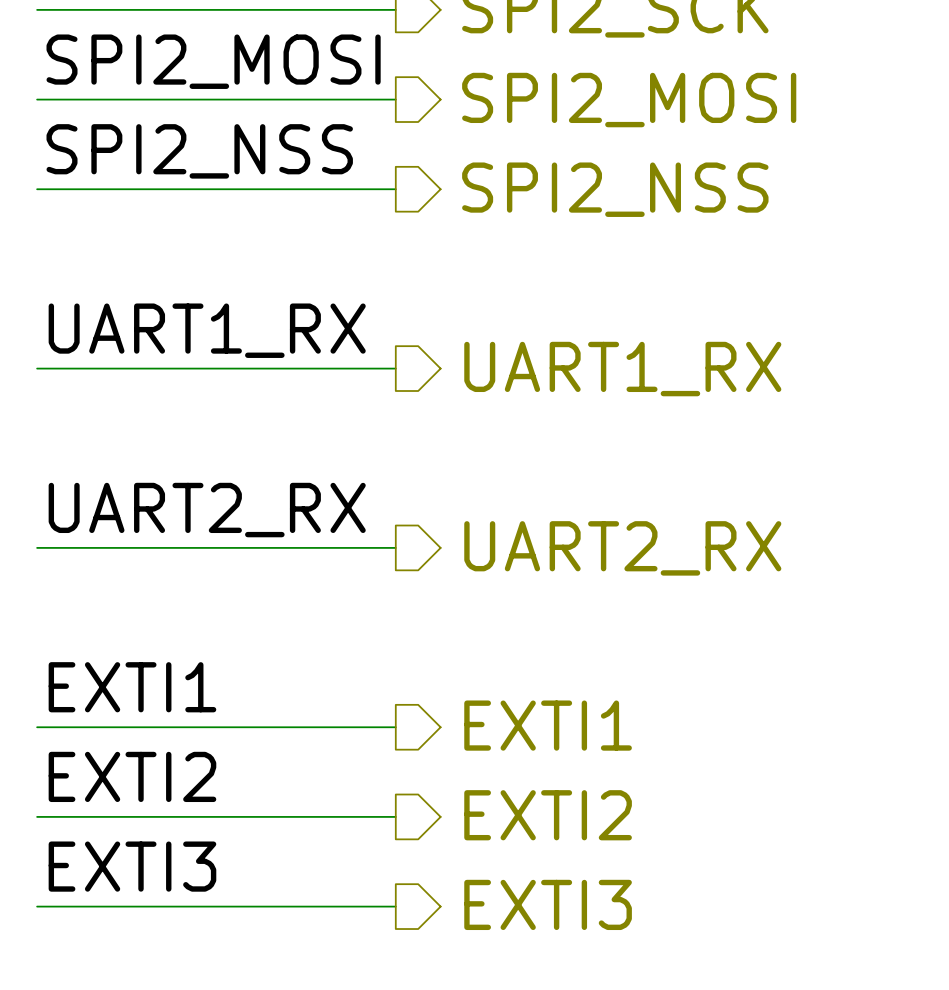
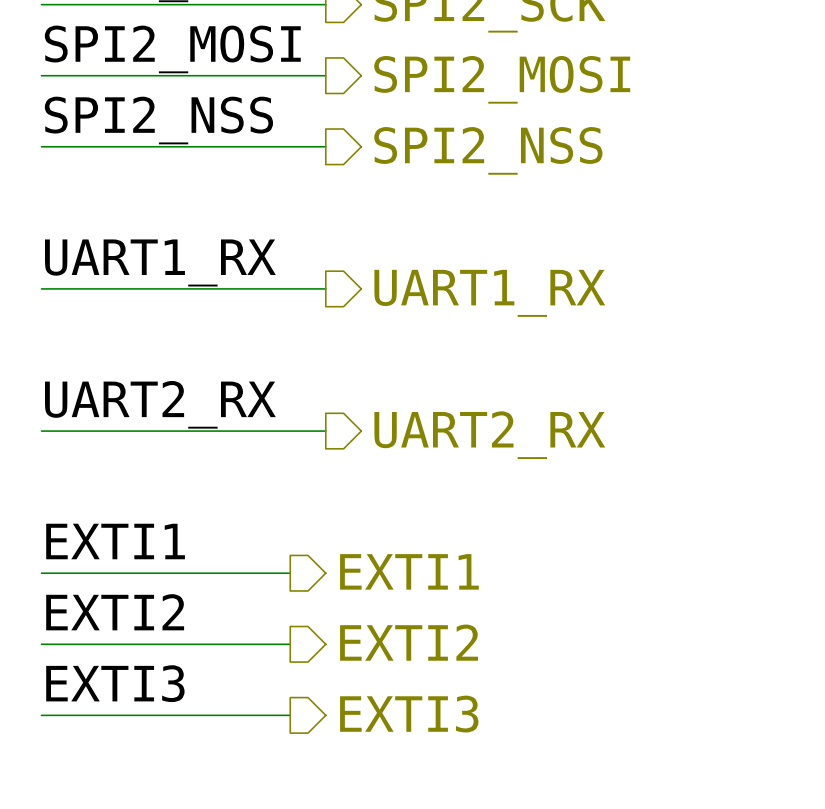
hierarchical label position: EXTI1 (548, 725) -> EXTI1 (409, 571)
wire: (350, 727) (395, 727) -> none
hierarchical label position: EXTI2 (548, 815) -> EXTI2 (409, 642)
wire: (350, 816) (395, 816) -> none
hierarchical label position: EXTI3 (548, 904) -> EXTI3 (409, 714)
wire: (350, 906) (395, 906) -> none

